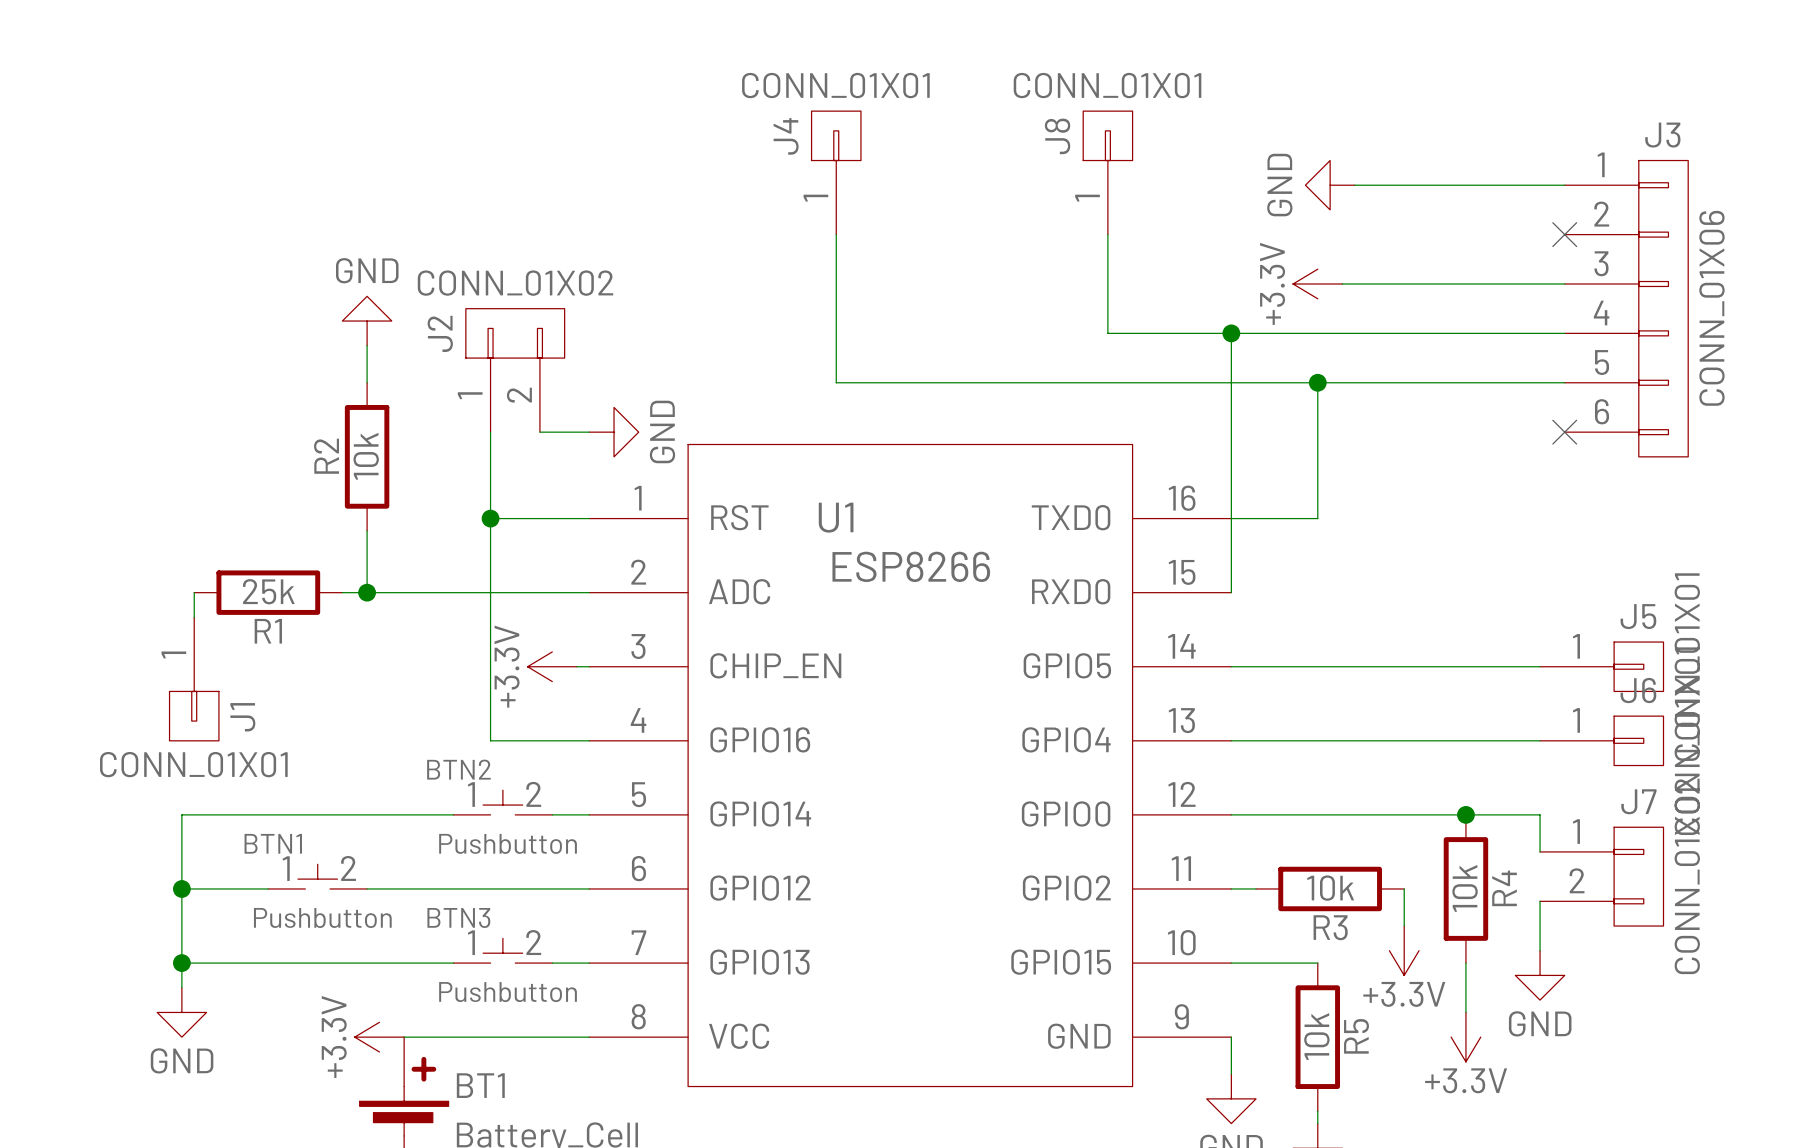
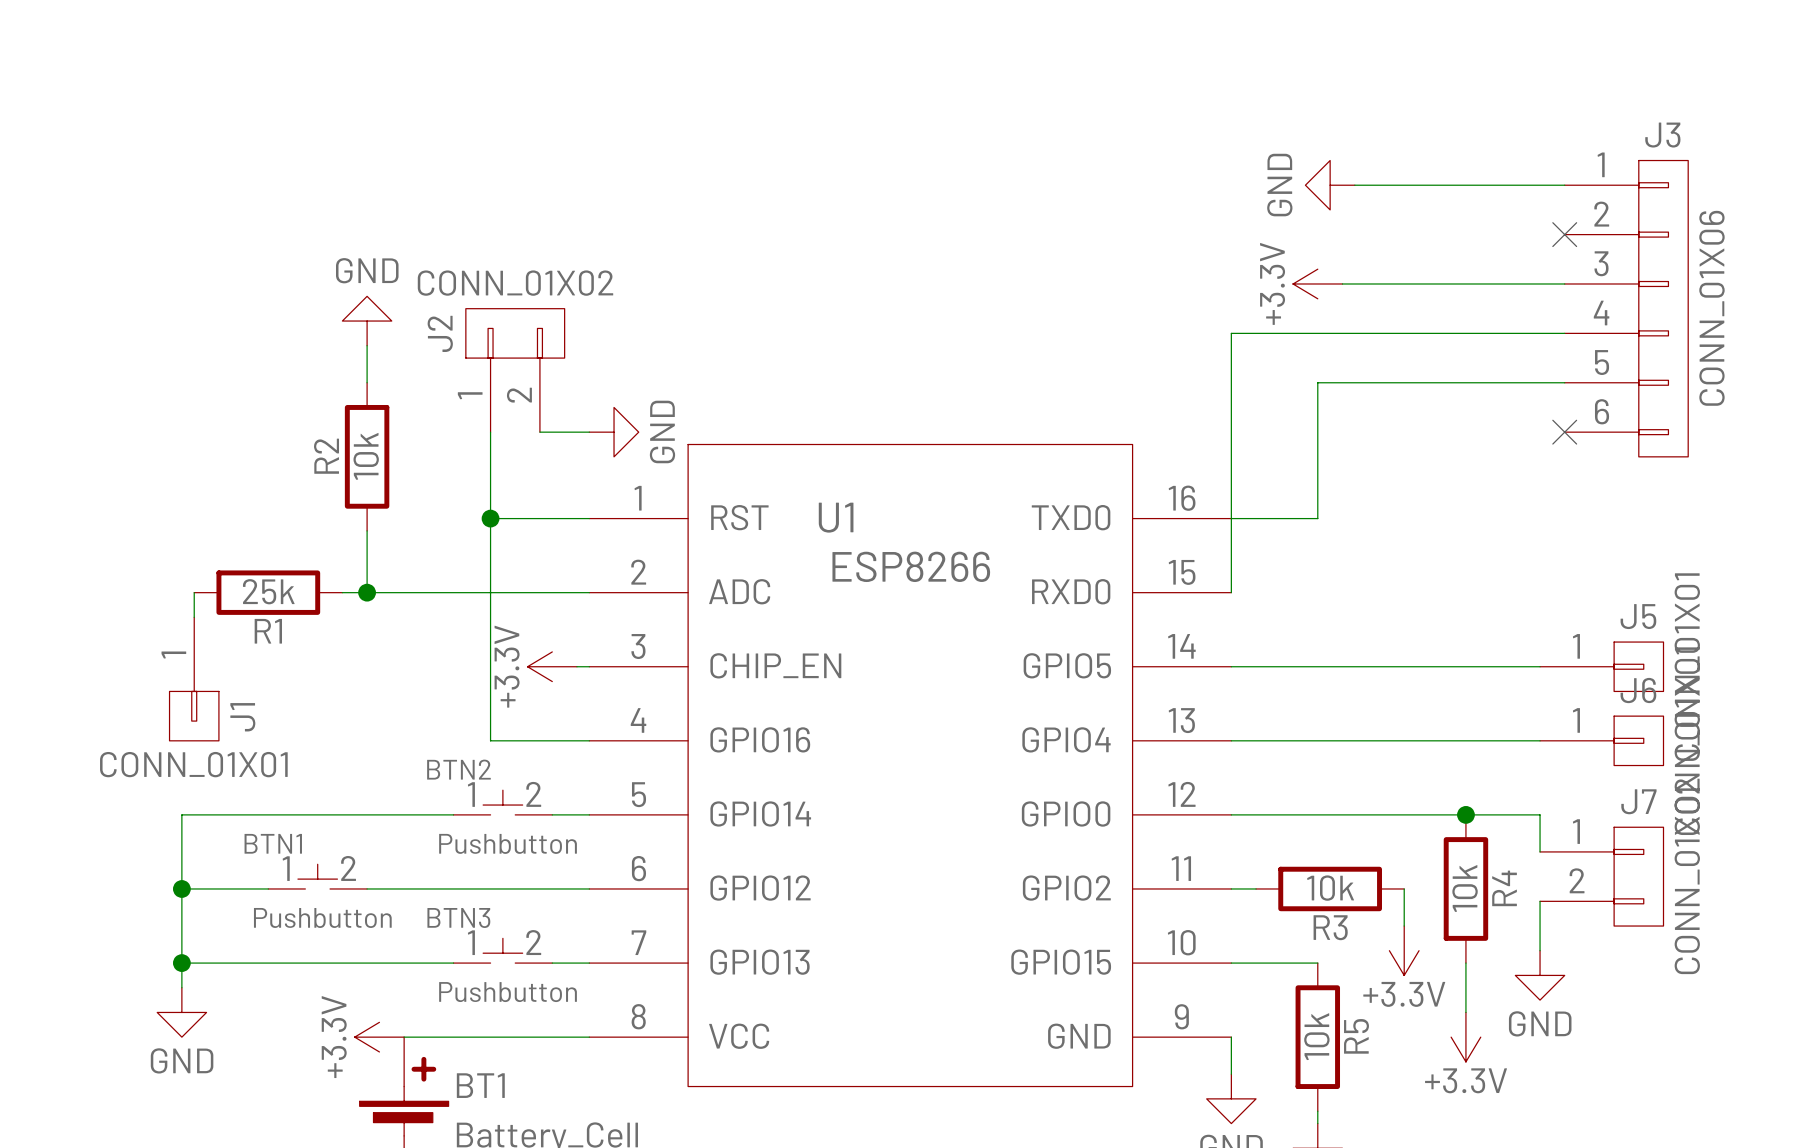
J4: CONN_01X01 (836, 172) -> none
J8: CONN_01X01 (1107, 172) -> none
wire: (836, 234) (836, 382) (1317, 382) -> none
wire: (1107, 234) (1107, 333) (1231, 333) -> none
junction: (1231, 333) -> none
junction: (1317, 382) -> none

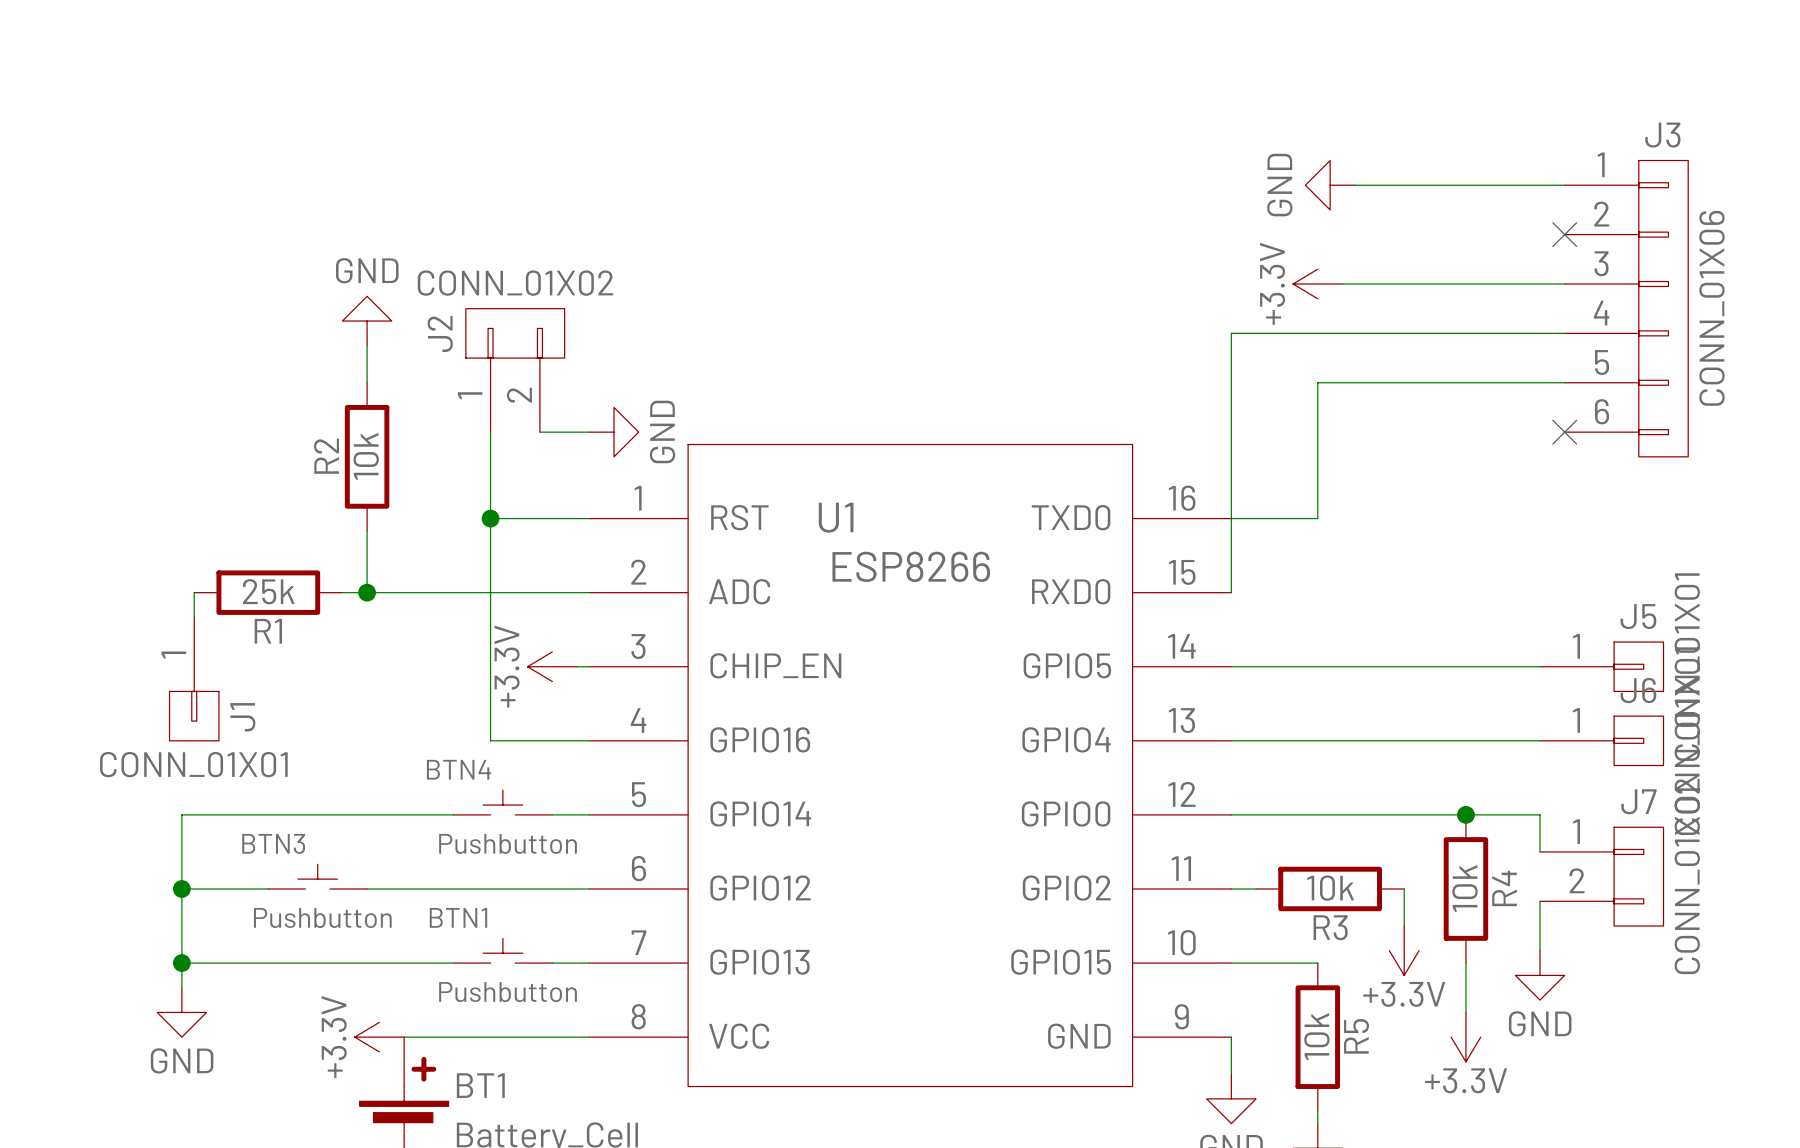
BTN2 name: BTN2 (458, 769) -> BTN4 (458, 769)
BTN2 pin number: 1 (471, 794) -> none
BTN2 pin number: 2 (533, 794) -> none
BTN1 pin number: 1 (286, 868) -> none
BTN1 pin number: 2 (348, 868) -> none
BTN1 position: (317, 876) -> (502, 950)
BTN3 pin number: 1 (471, 942) -> none
BTN3 pin number: 2 (533, 942) -> none
BTN3 position: (502, 950) -> (317, 876)

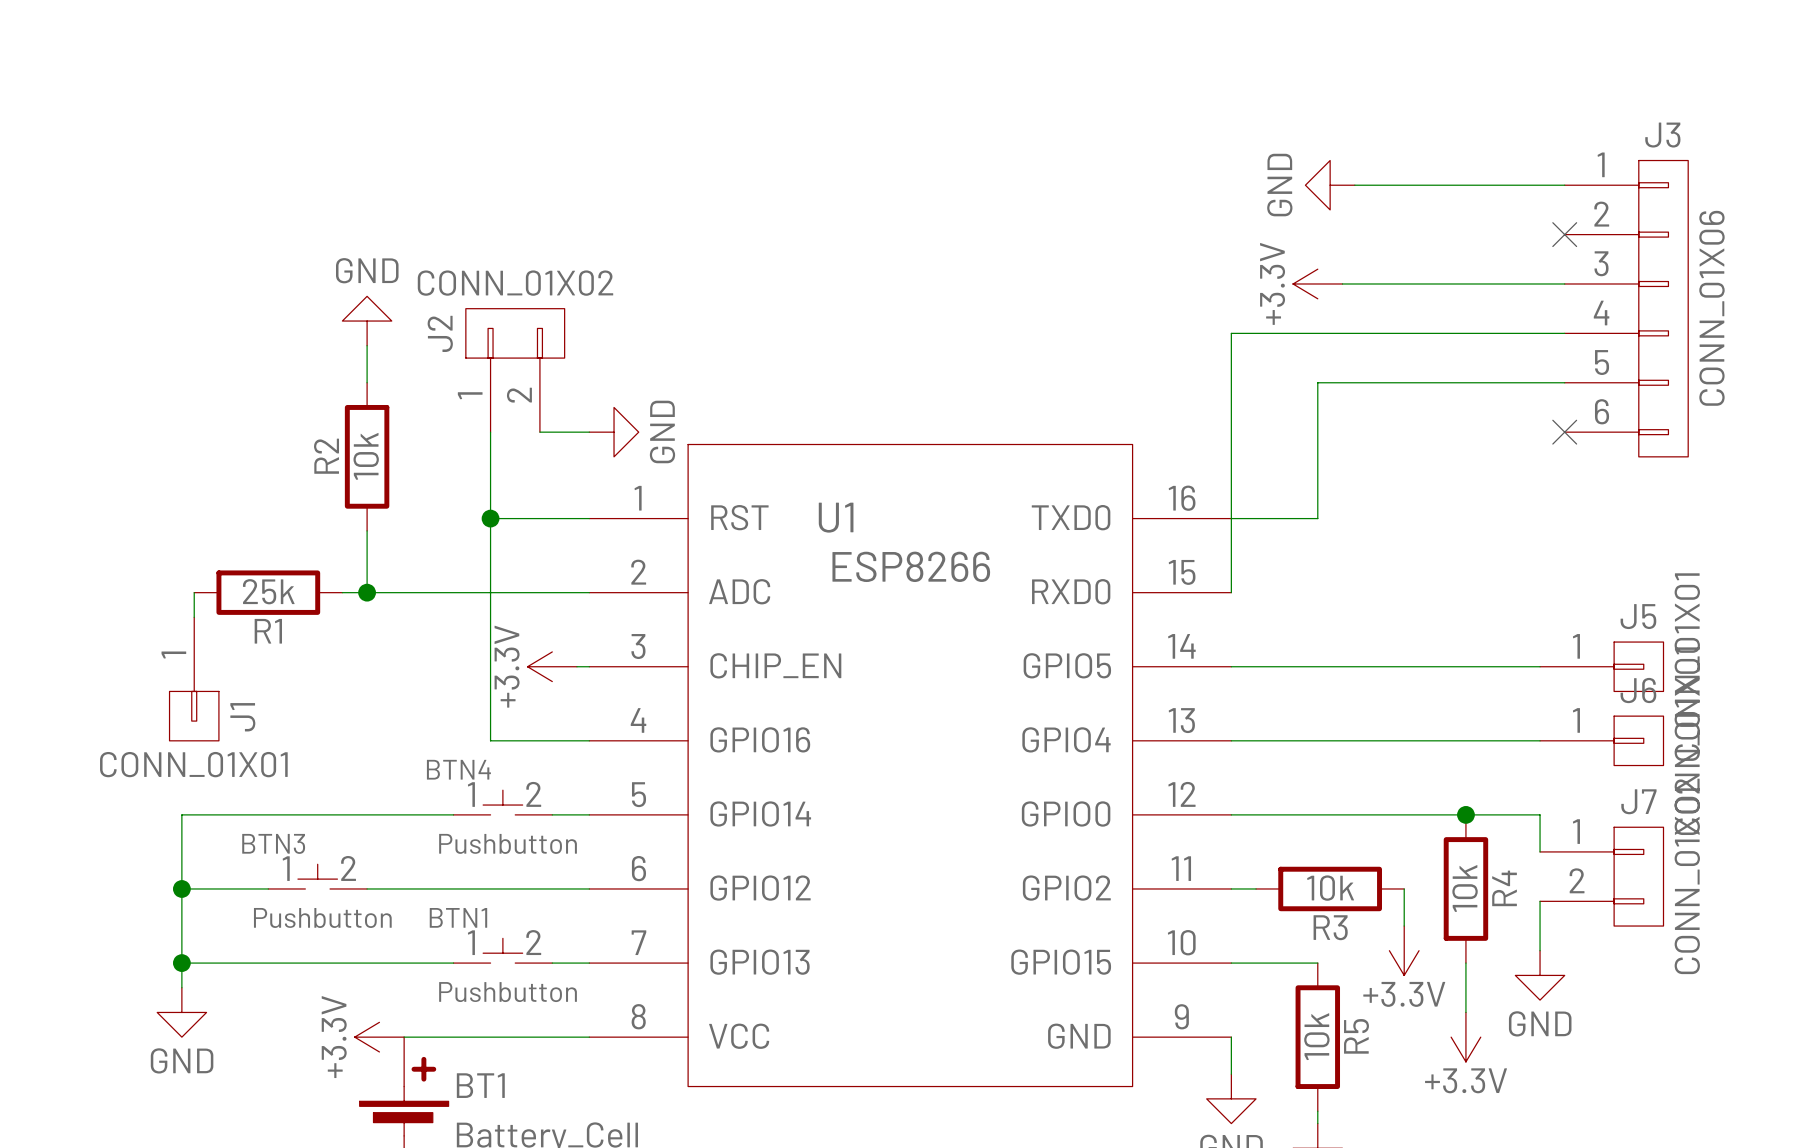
BTN4 pin number: none -> 1 (471, 794)
BTN4 pin number: none -> 2 (533, 794)
BTN3 pin number: none -> 1 (286, 868)
BTN3 pin number: none -> 2 (348, 868)
BTN1 pin number: none -> 1 (471, 942)
BTN1 pin number: none -> 2 (533, 942)

